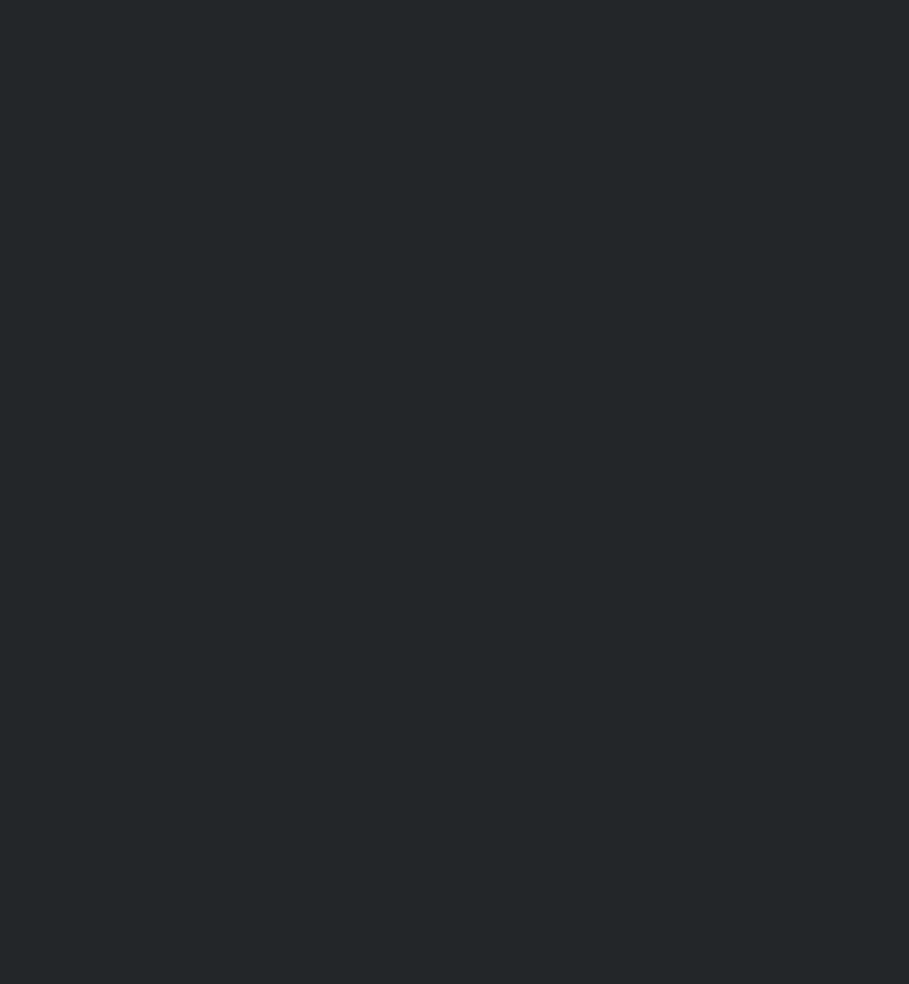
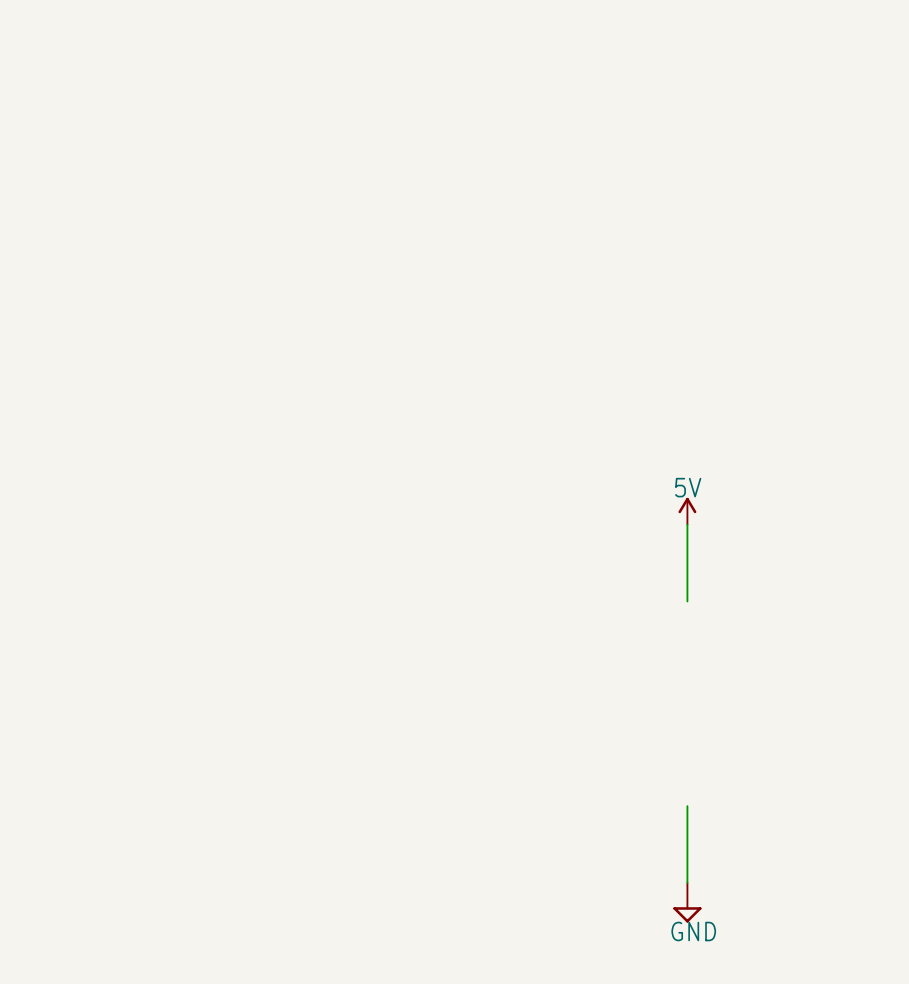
power symbol: none -> 5V (687, 511)
wire: none -> (687, 524) (687, 601)
wire: none -> (687, 806) (687, 882)
power symbol: none -> GND (687, 902)

